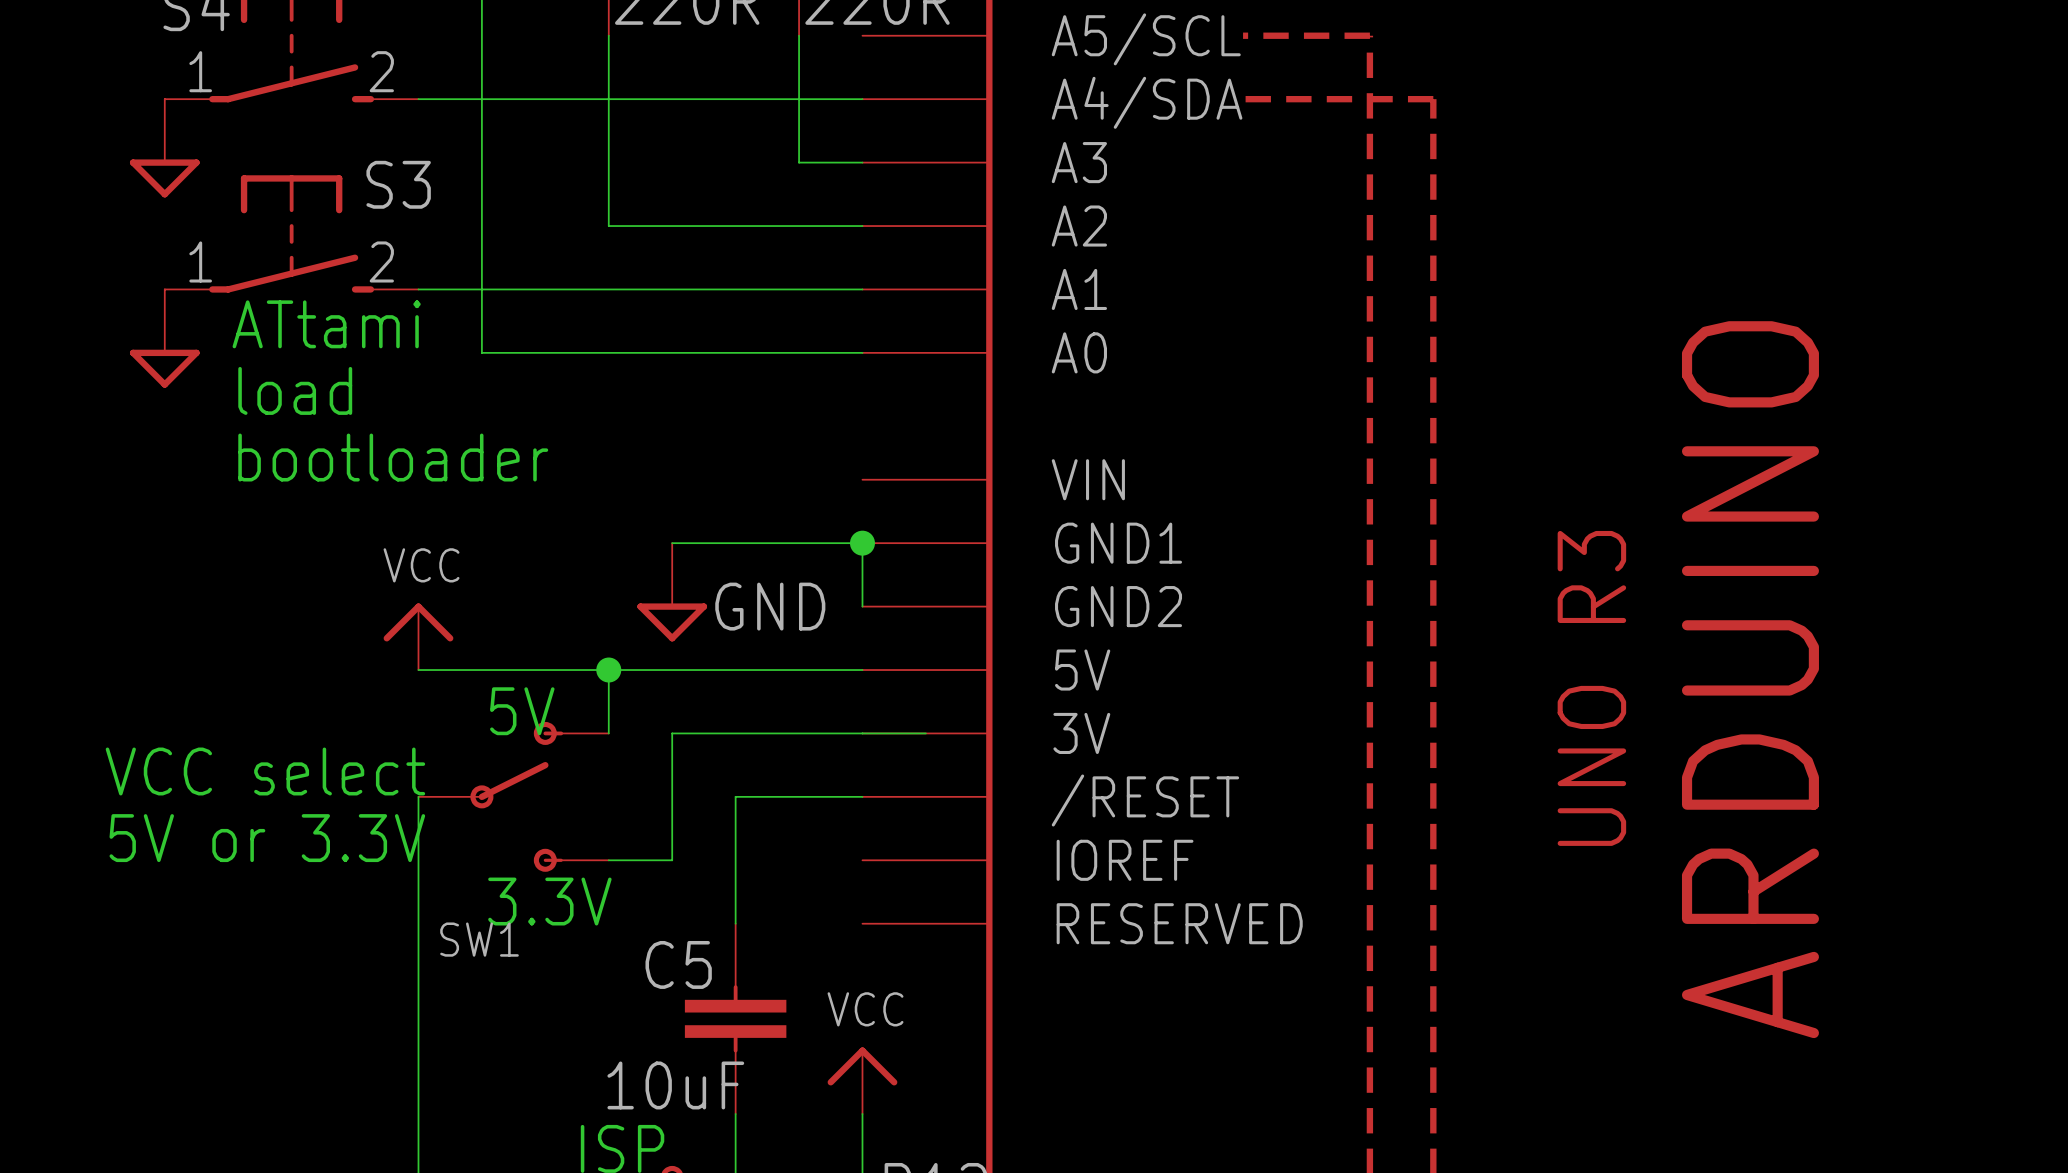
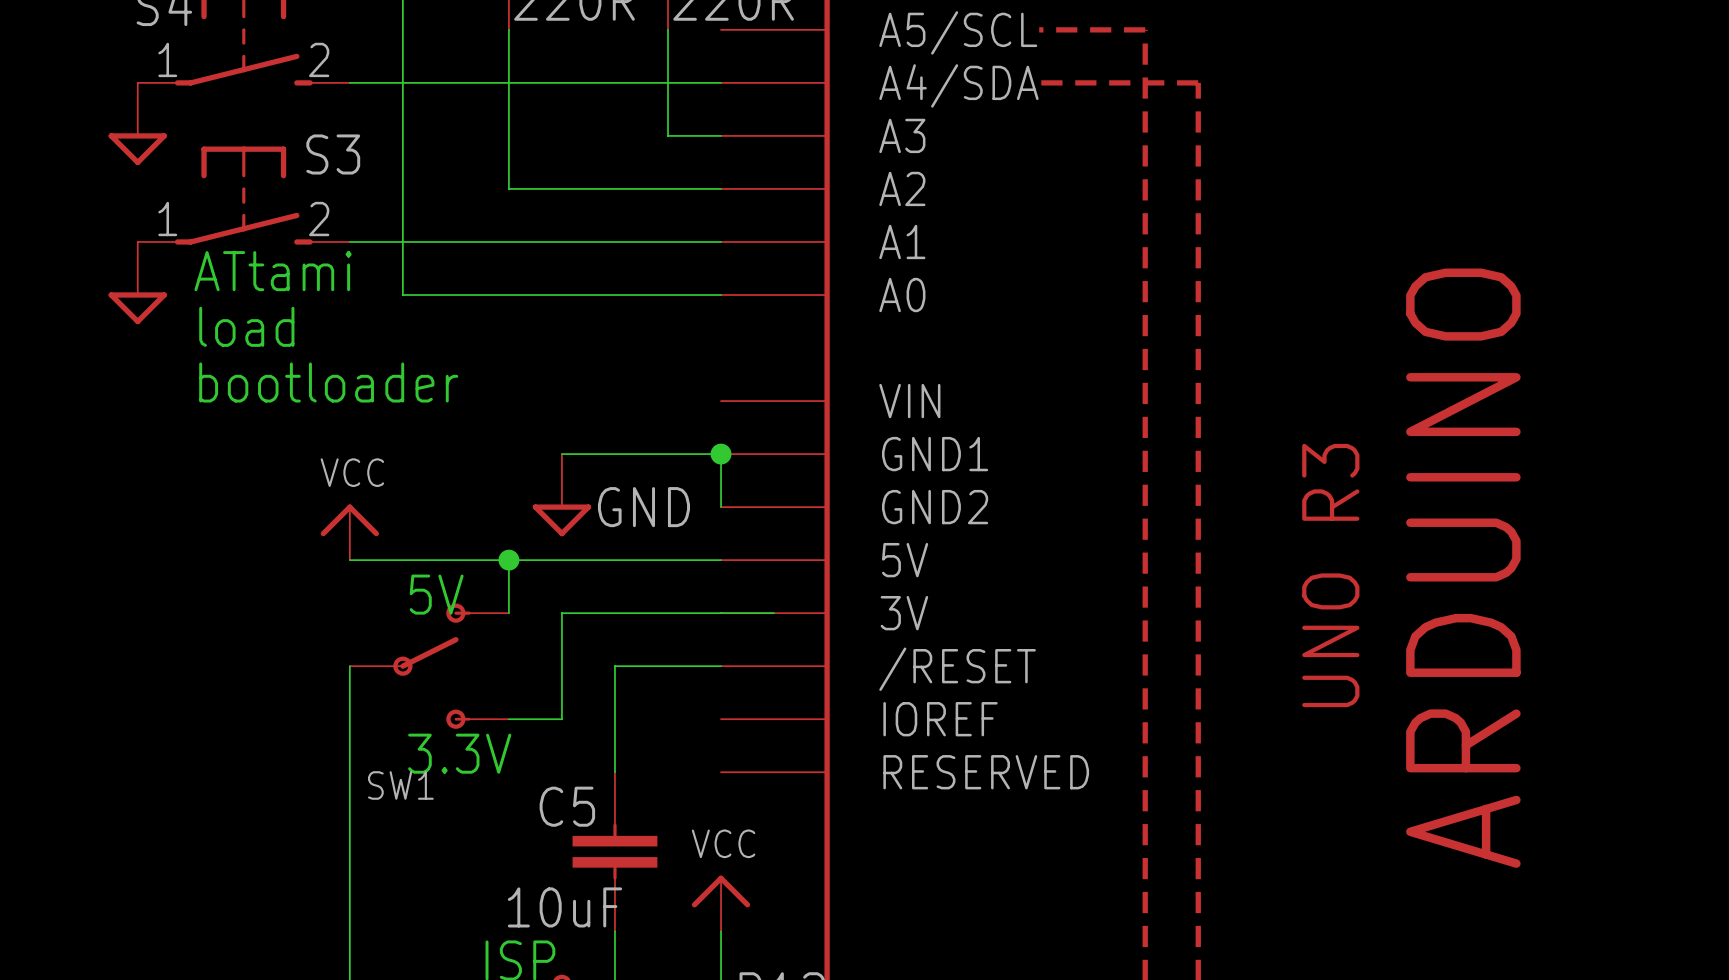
text: VCC select (265, 771) -> none
text: 5V or 3.3V (267, 838) -> none

